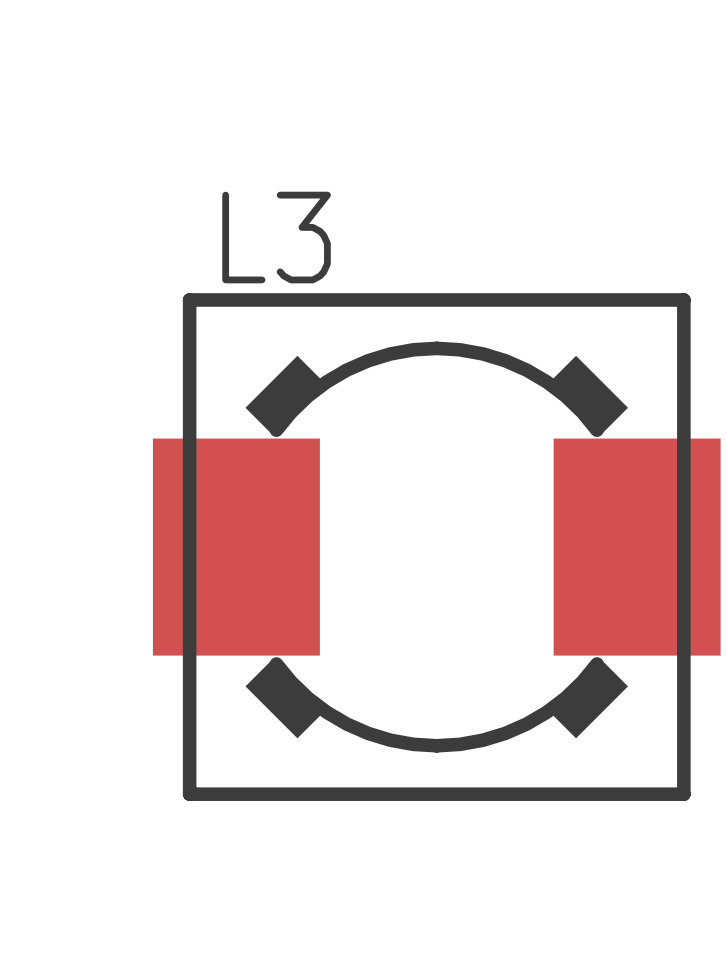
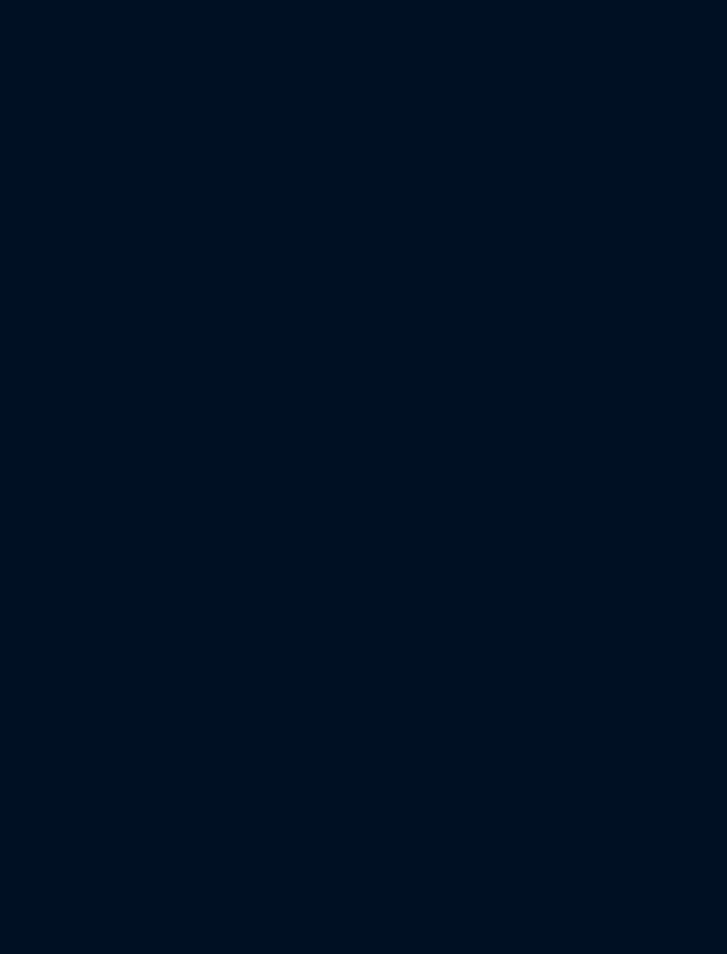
L3: (436, 547) -> none

